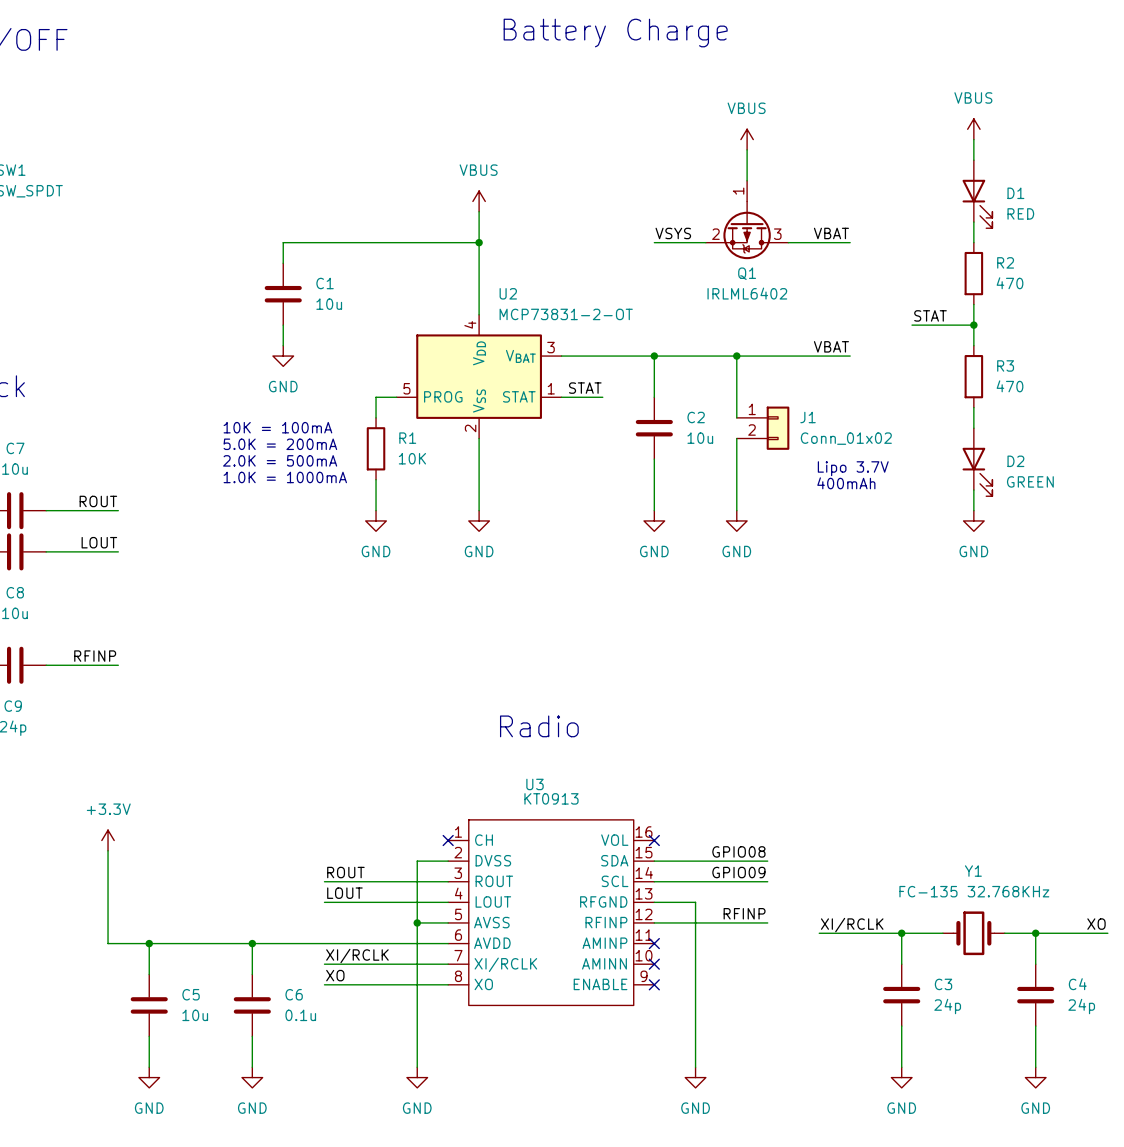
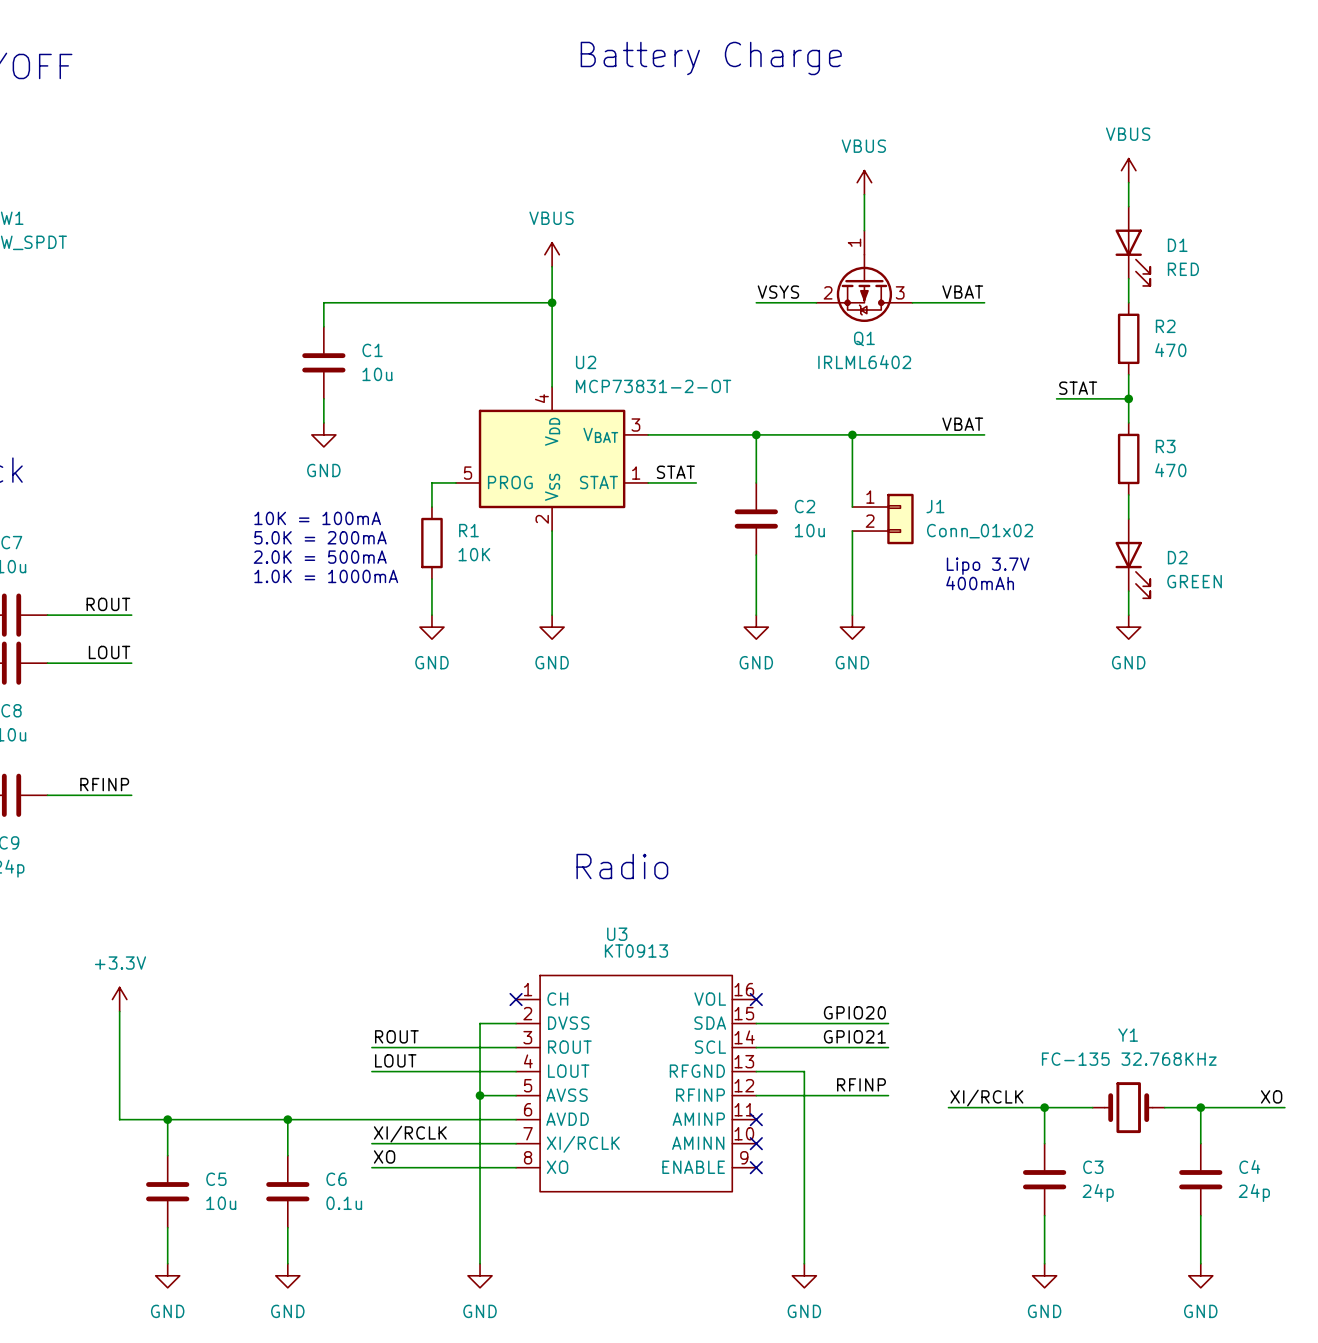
label: GPIO08 (738, 851) -> GPIO20 (854, 1012)
label: GPIO09 (738, 872) -> GPIO21 (854, 1036)

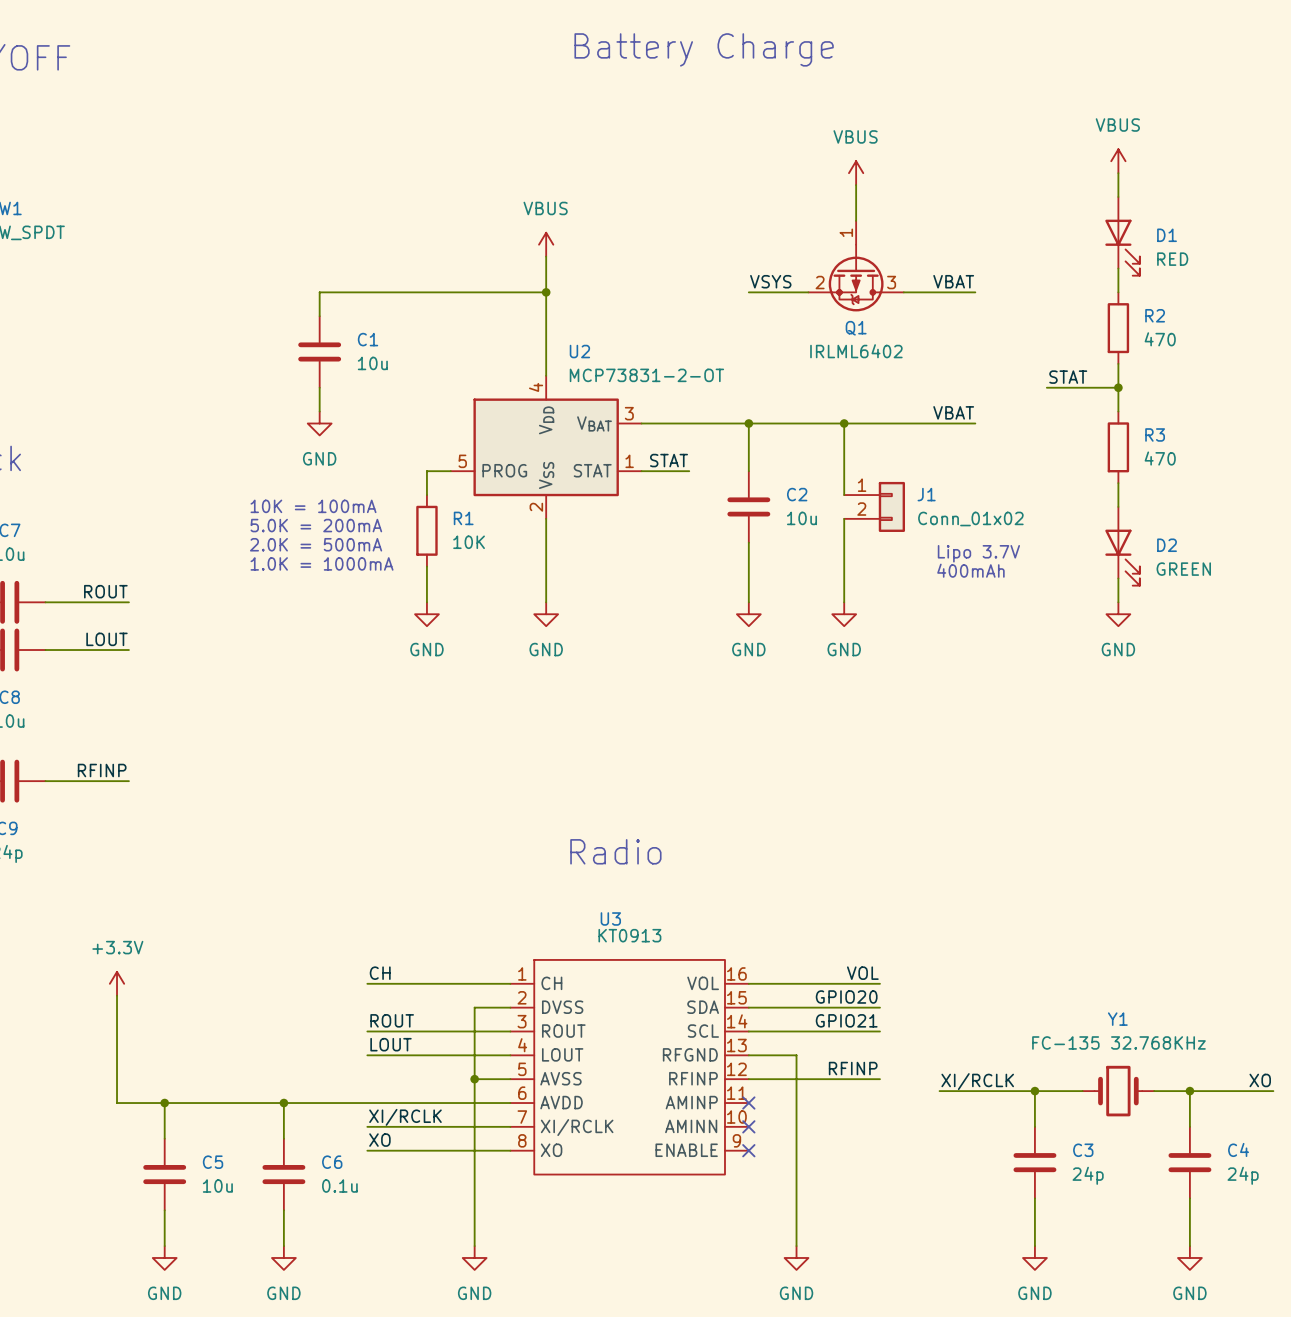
label: none -> CH (380, 973)
label: none -> VOL (862, 973)
wire: none -> (367, 983) (510, 983)
no-connect mark: (516, 999) -> none
wire: none -> (748, 983) (879, 983)
no-connect mark: (756, 999) -> none

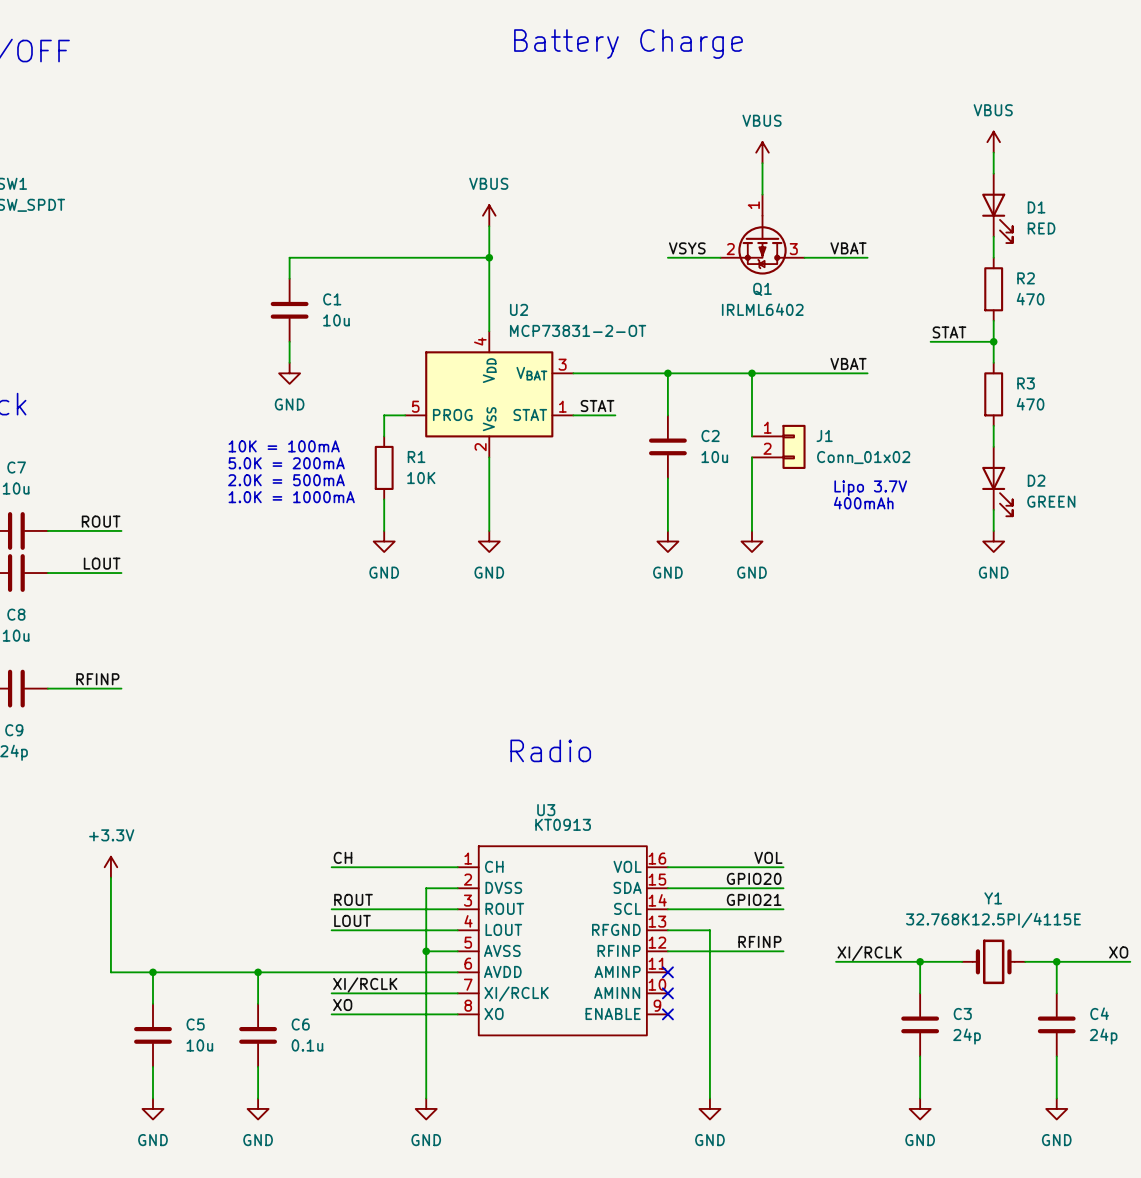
Y1 value: FC-135 32.768KHz (1118, 1042) -> 32.768K12.5PI/4115E (993, 920)

